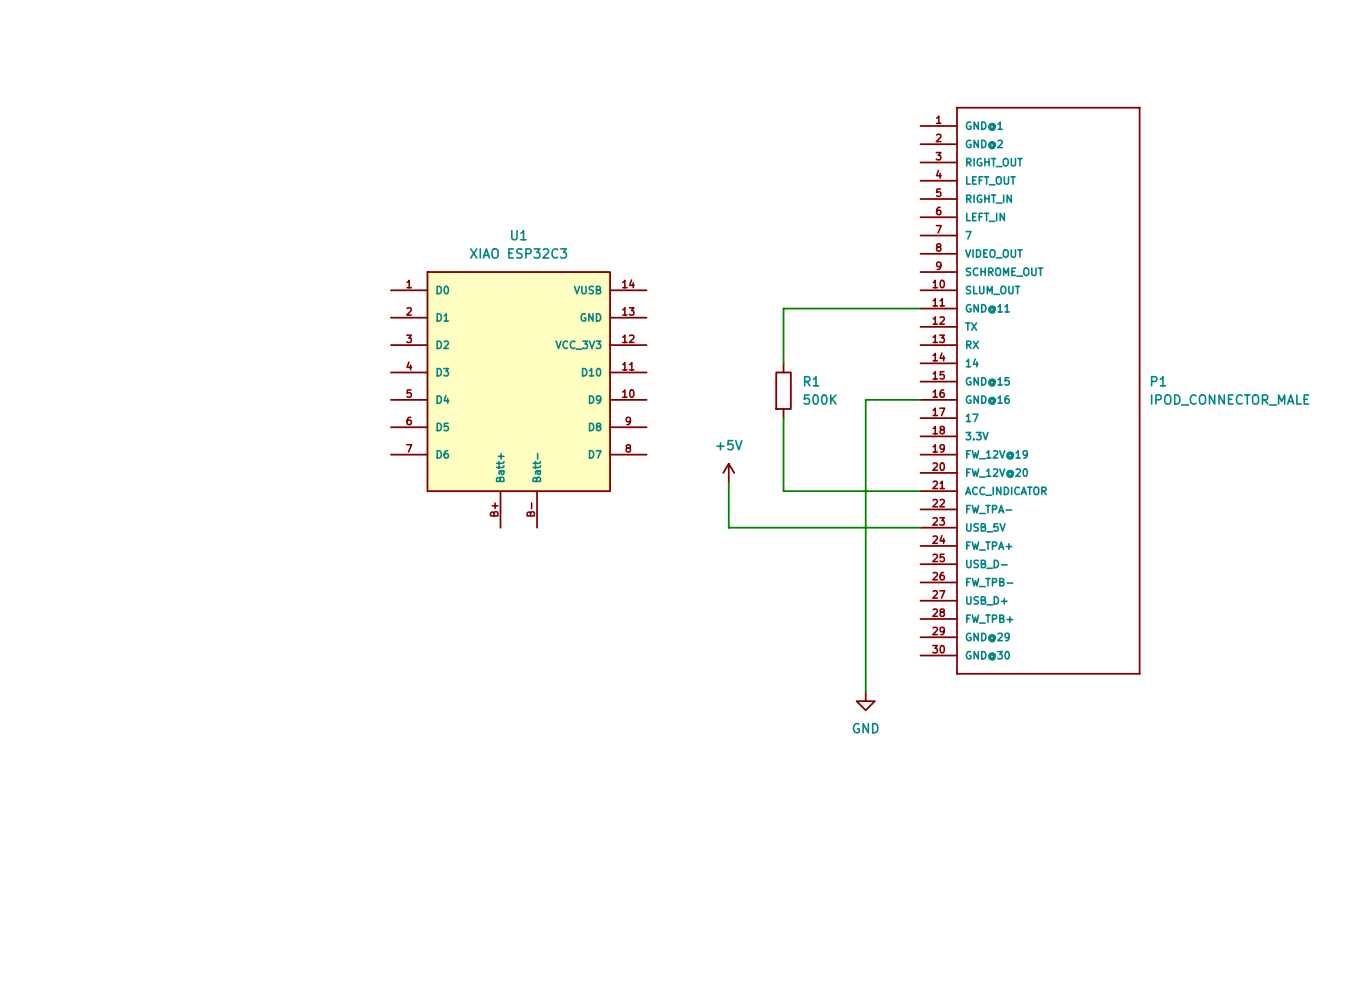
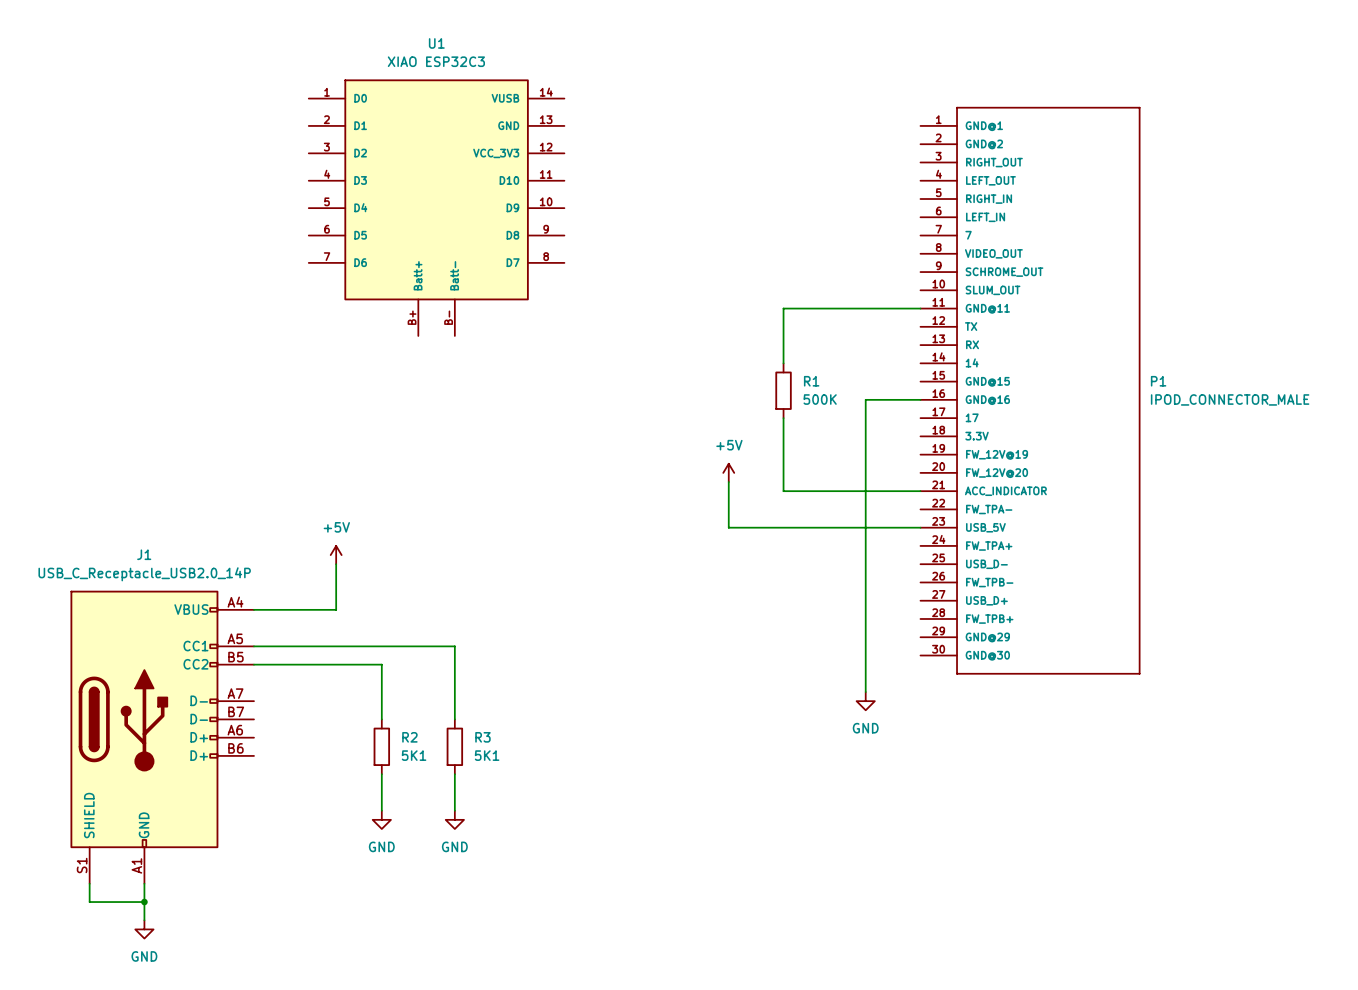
U1 position: (518, 399) -> (436, 207)
power symbol: none -> +5V (336, 555)
wire: none -> (336, 564) (336, 609) (253, 609)
wire: none -> (253, 646) (454, 646) (454, 719)
wire: none -> (253, 664) (381, 664) (381, 719)
J1: none -> USB_C_Receptacle_USB2.0_14P (162, 737)
R2: none -> 5K1 (381, 746)
R3: none -> 5K1 (454, 746)
wire: none -> (381, 774) (381, 810)
wire: none -> (454, 774) (454, 810)
power symbol: none -> GND (381, 819)
power symbol: none -> GND (454, 819)
wire: none -> (89, 883) (89, 902) (144, 902)
wire: none -> (144, 883) (144, 920)
junction: none -> (144, 902)
power symbol: none -> GND (144, 929)

